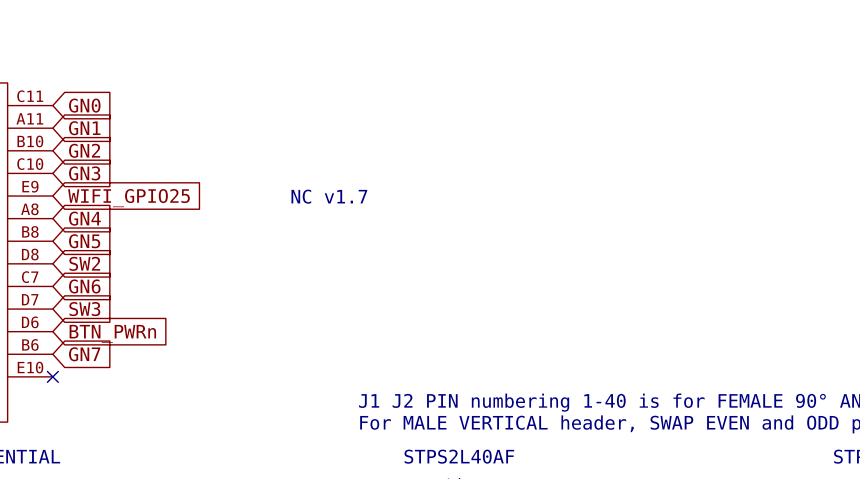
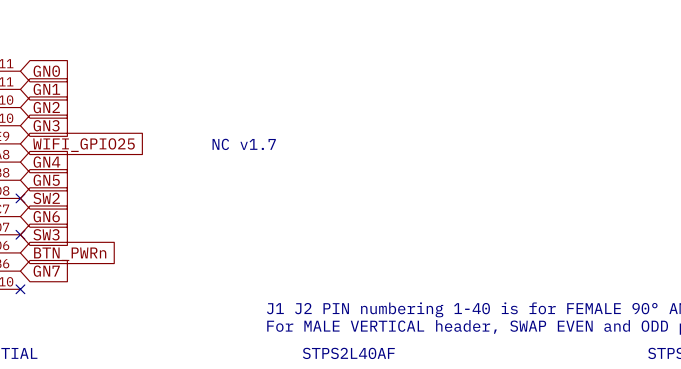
no-connect mark: none -> (20, 198)
no-connect mark: none -> (20, 234)

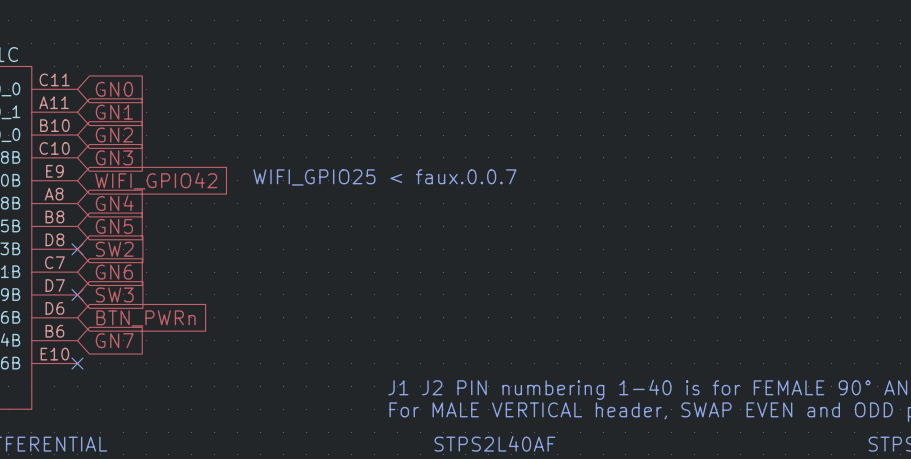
text: none -> WIFI_GPIO25 < faux.0.0.7 (384, 177)
text: NC v1.7 (244, 144) -> none
global label: WIFI_GPIO25 (84, 145) -> WIFI_GPIO42 (156, 181)

